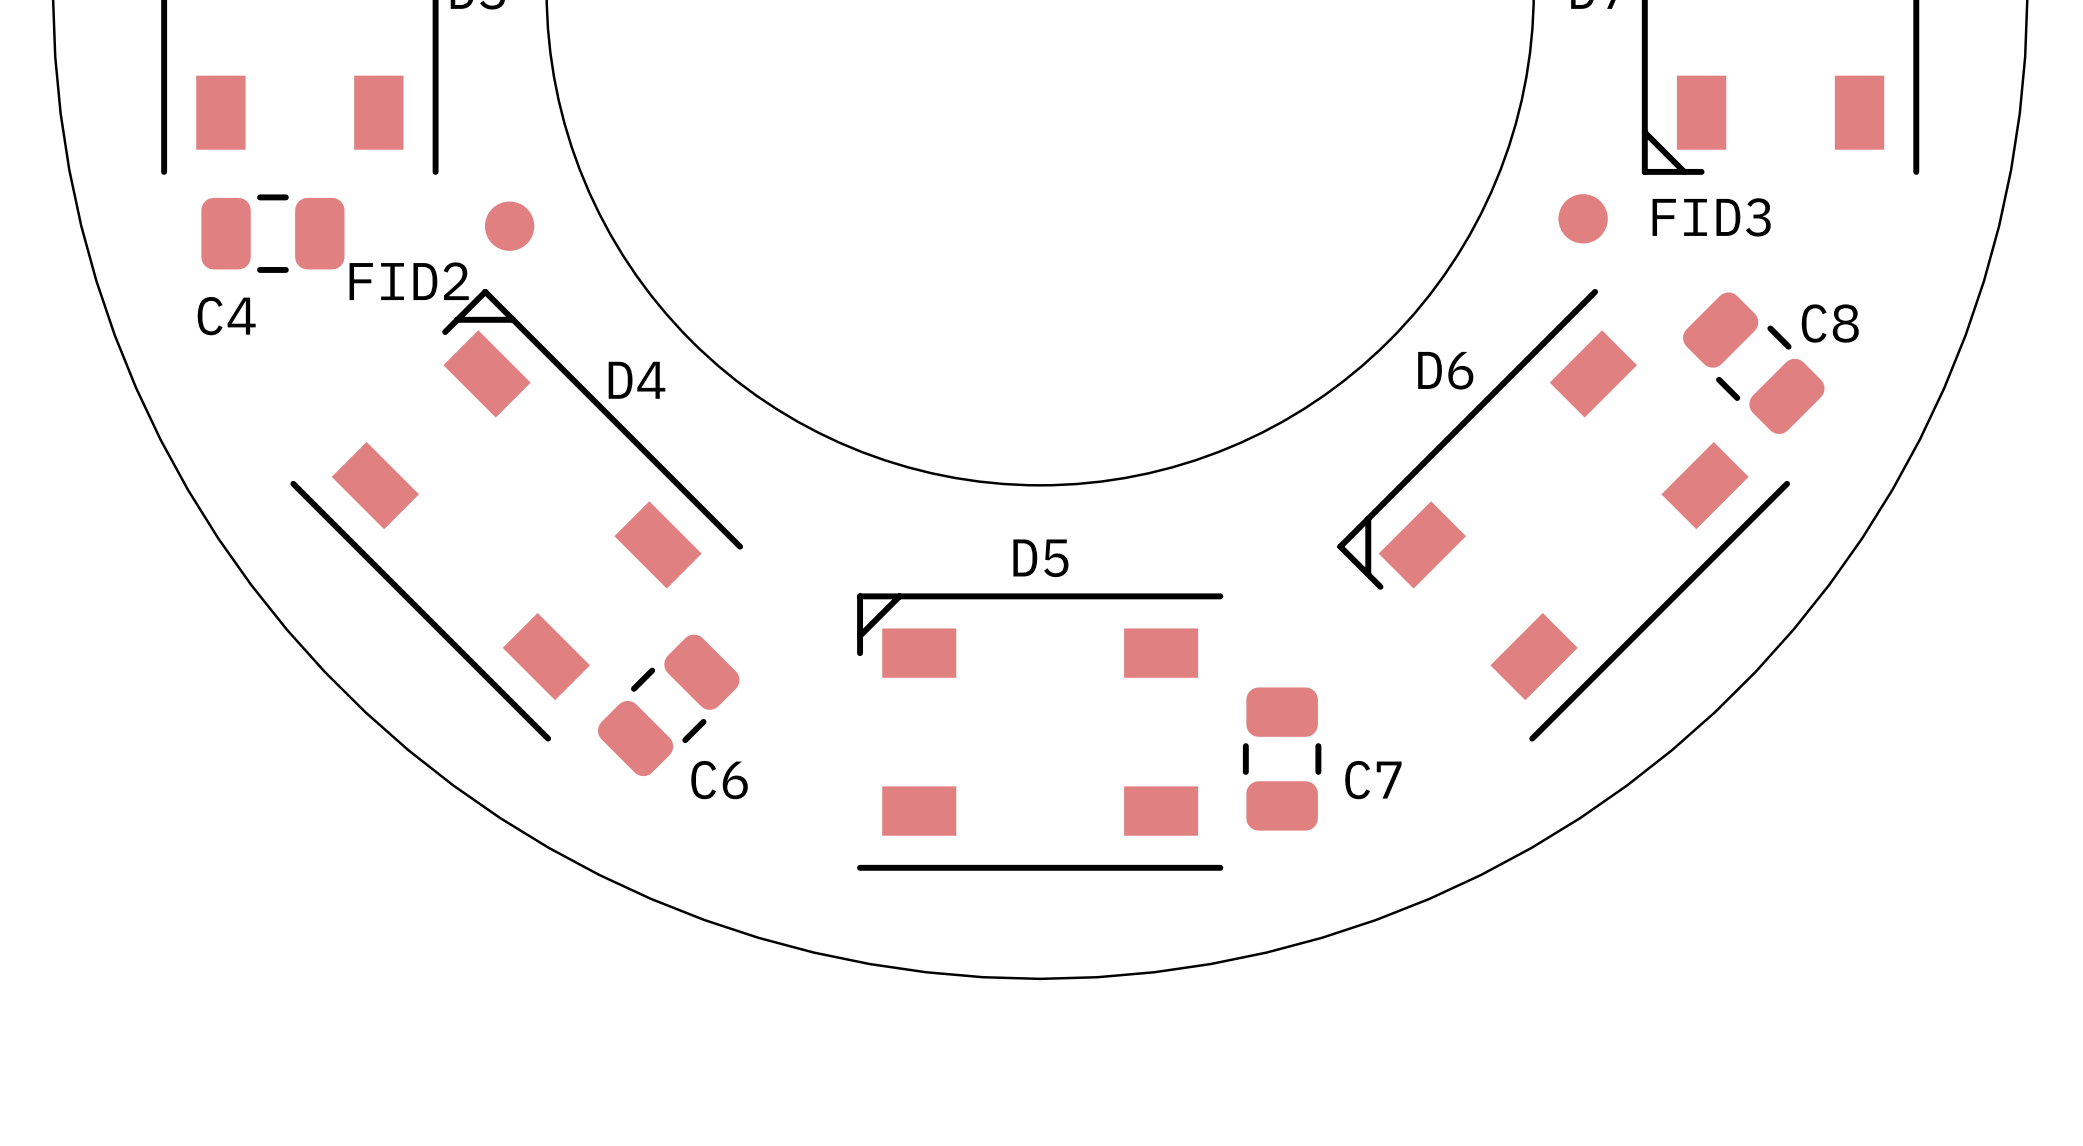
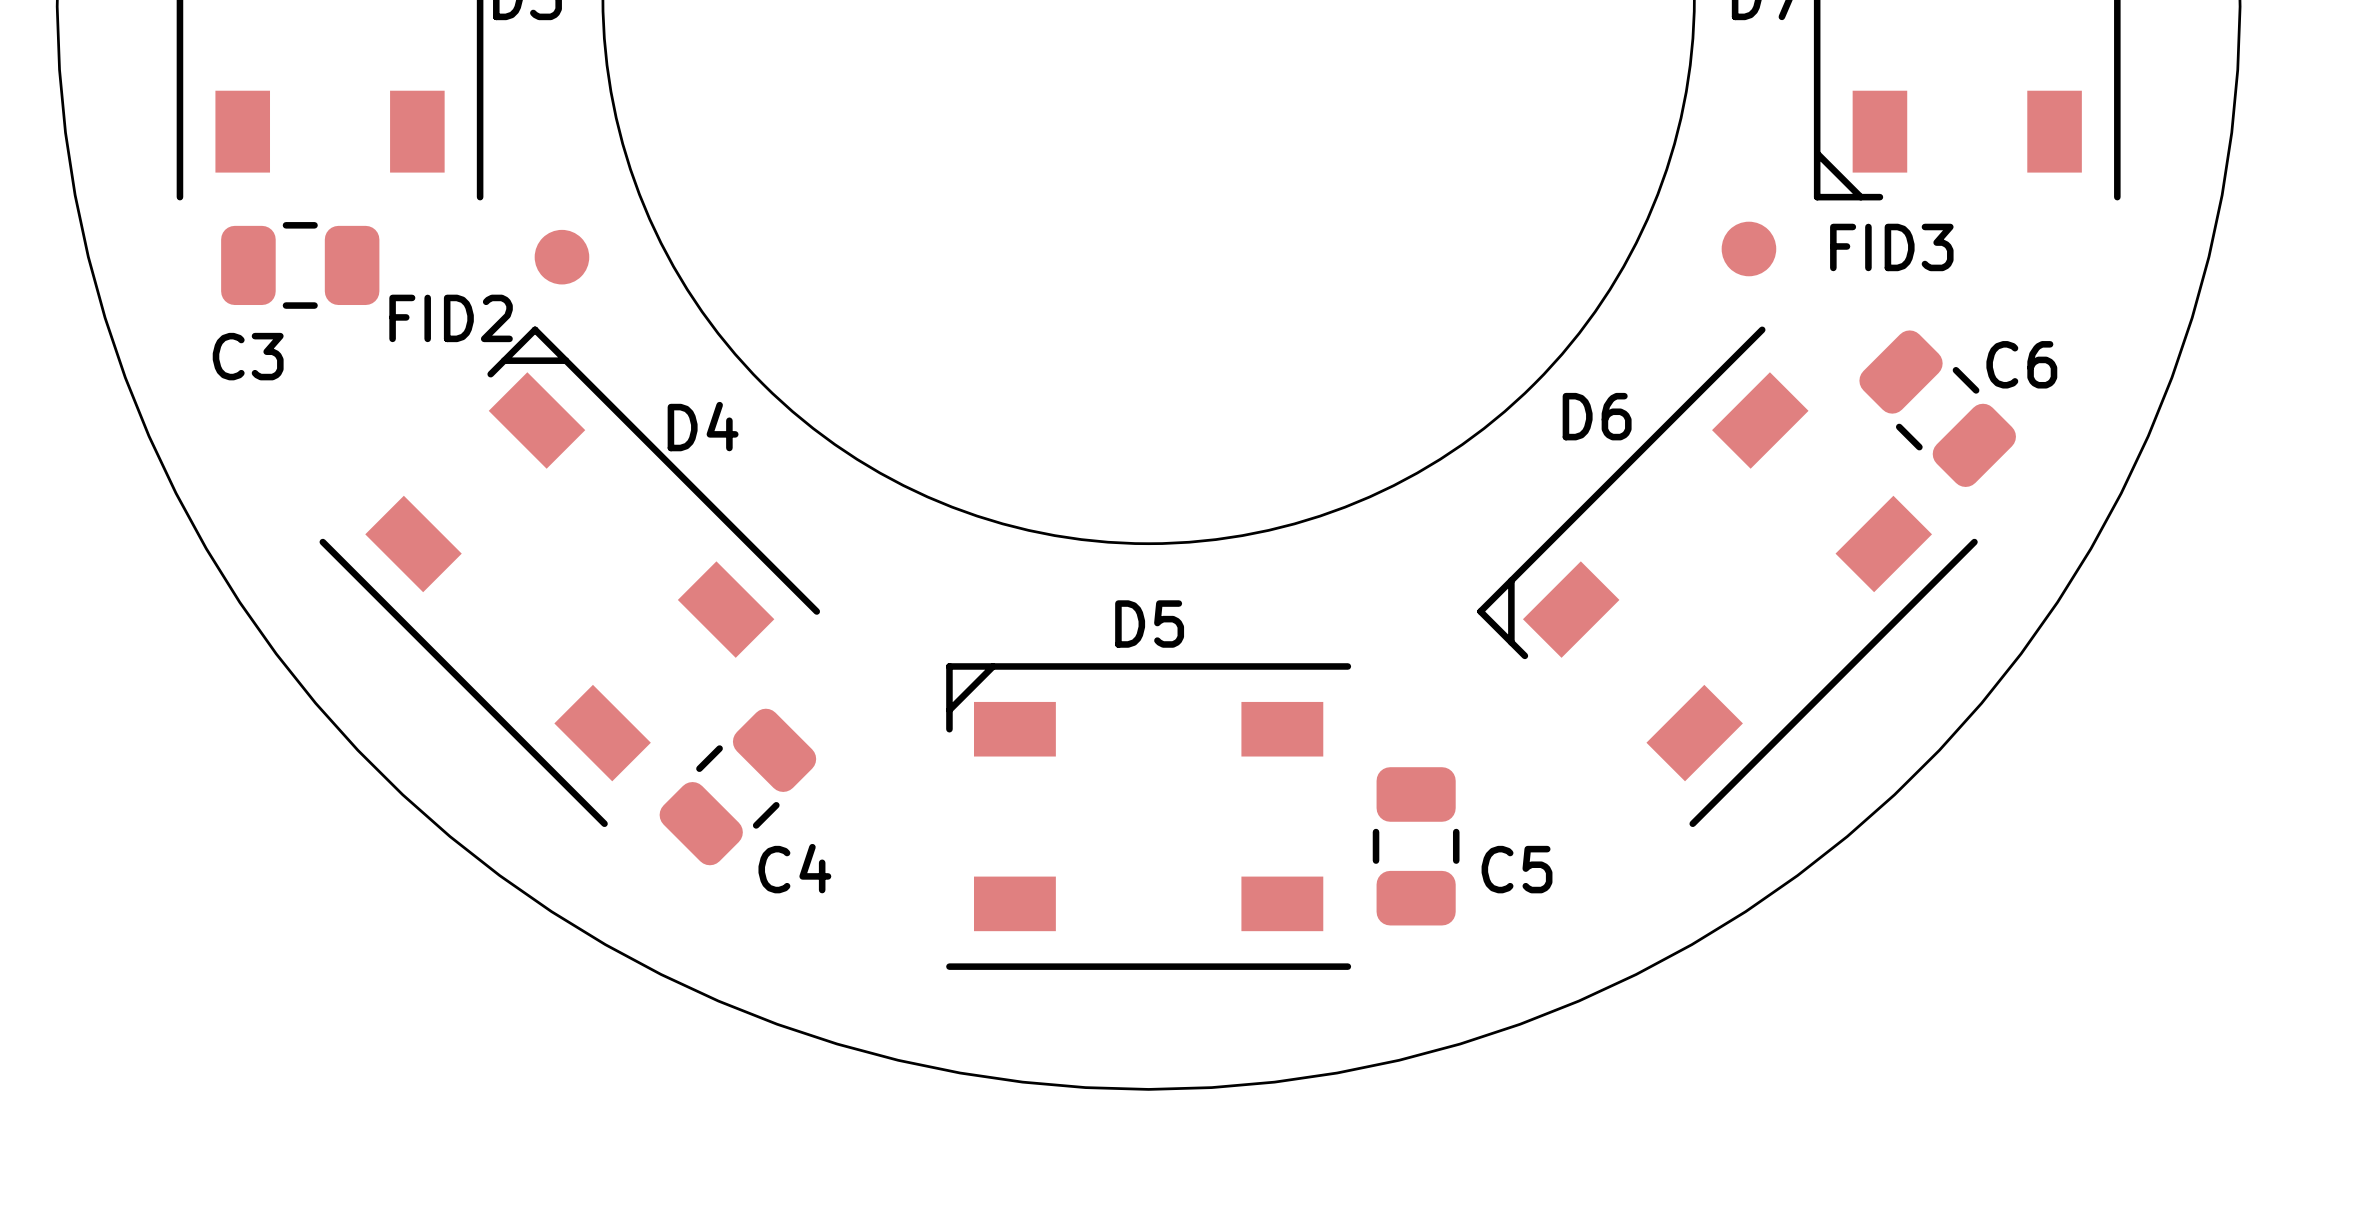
C4 name: C4 (226, 316) -> C3 (248, 356)
C8 name: C8 (1830, 323) -> C6 (2021, 364)
C6 name: C6 (719, 780) -> C4 (794, 868)
C7 name: C7 (1373, 780) -> C5 (1517, 869)

